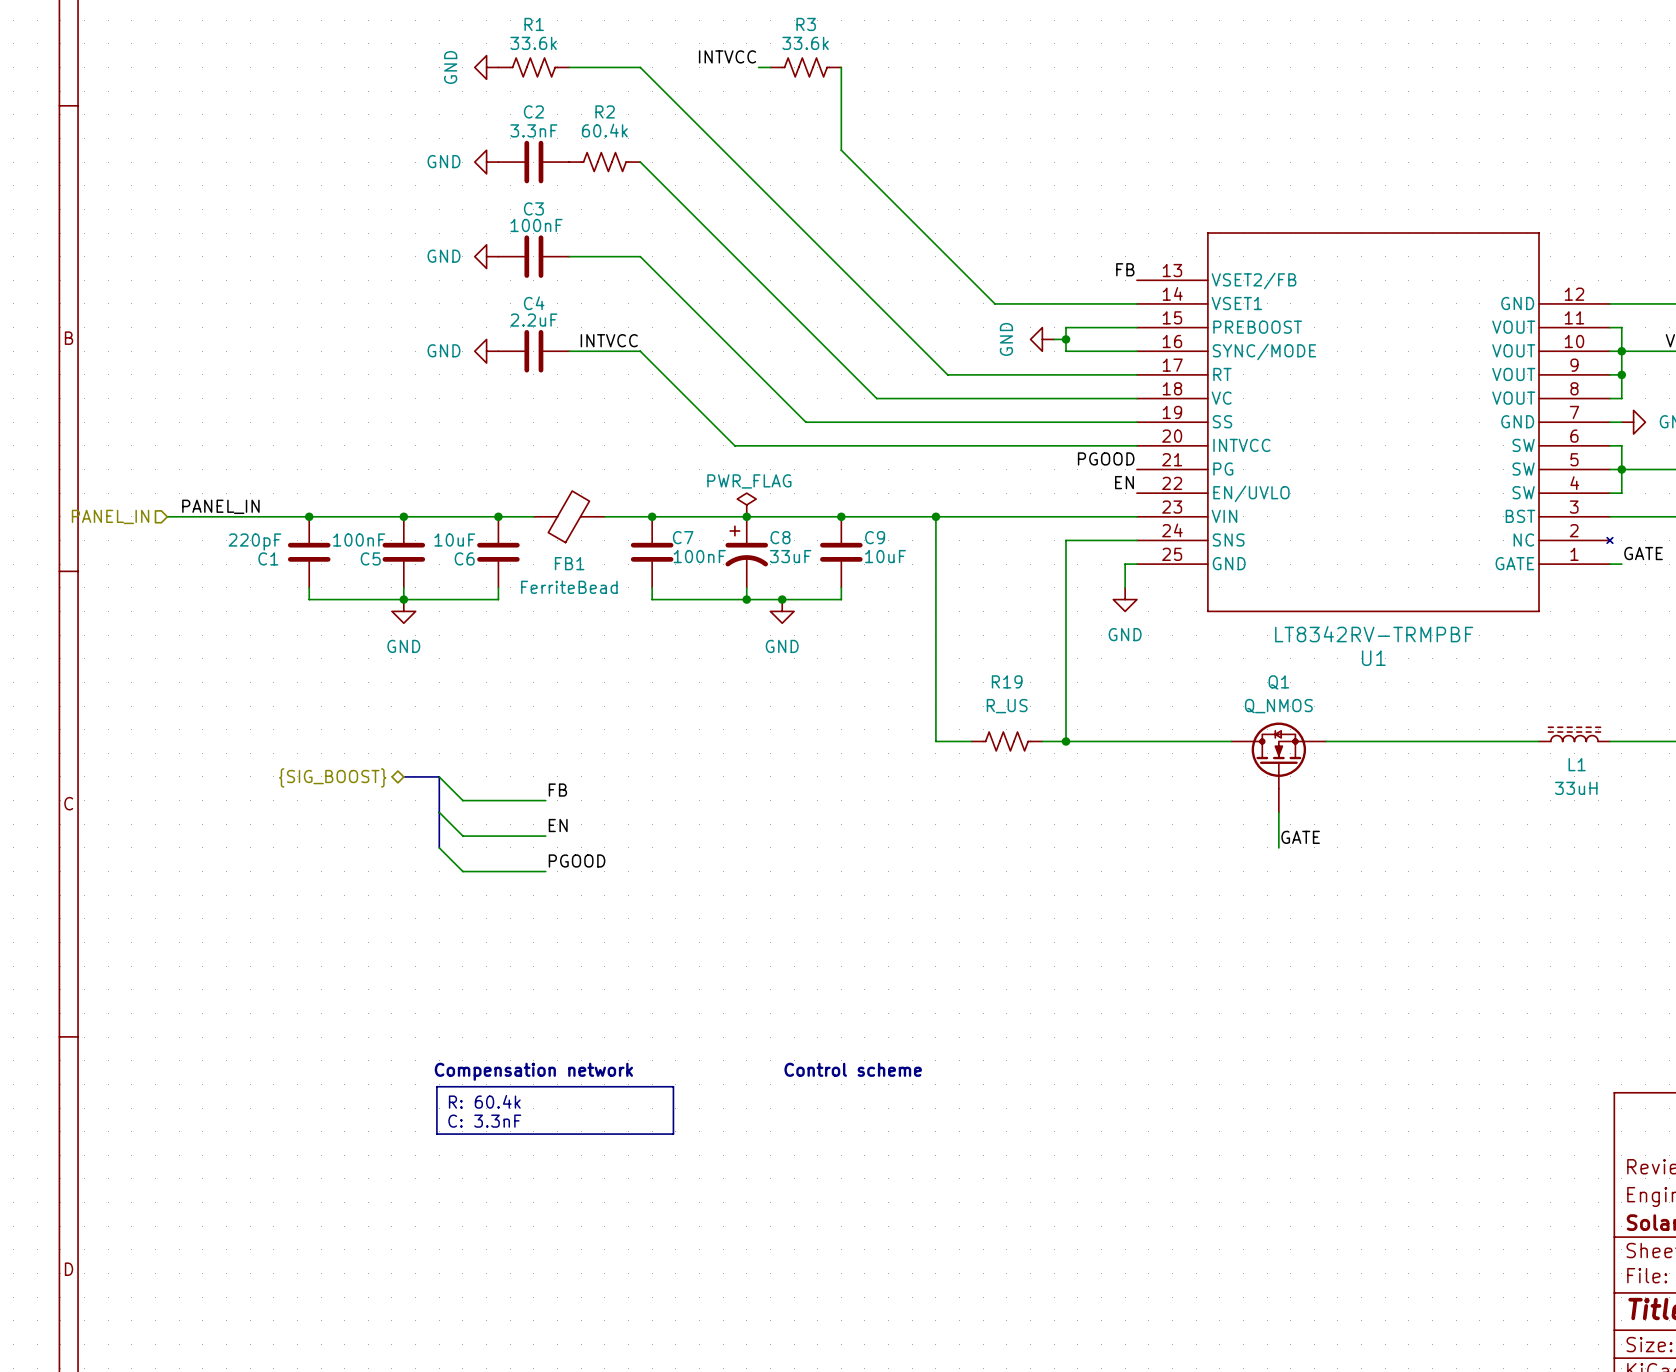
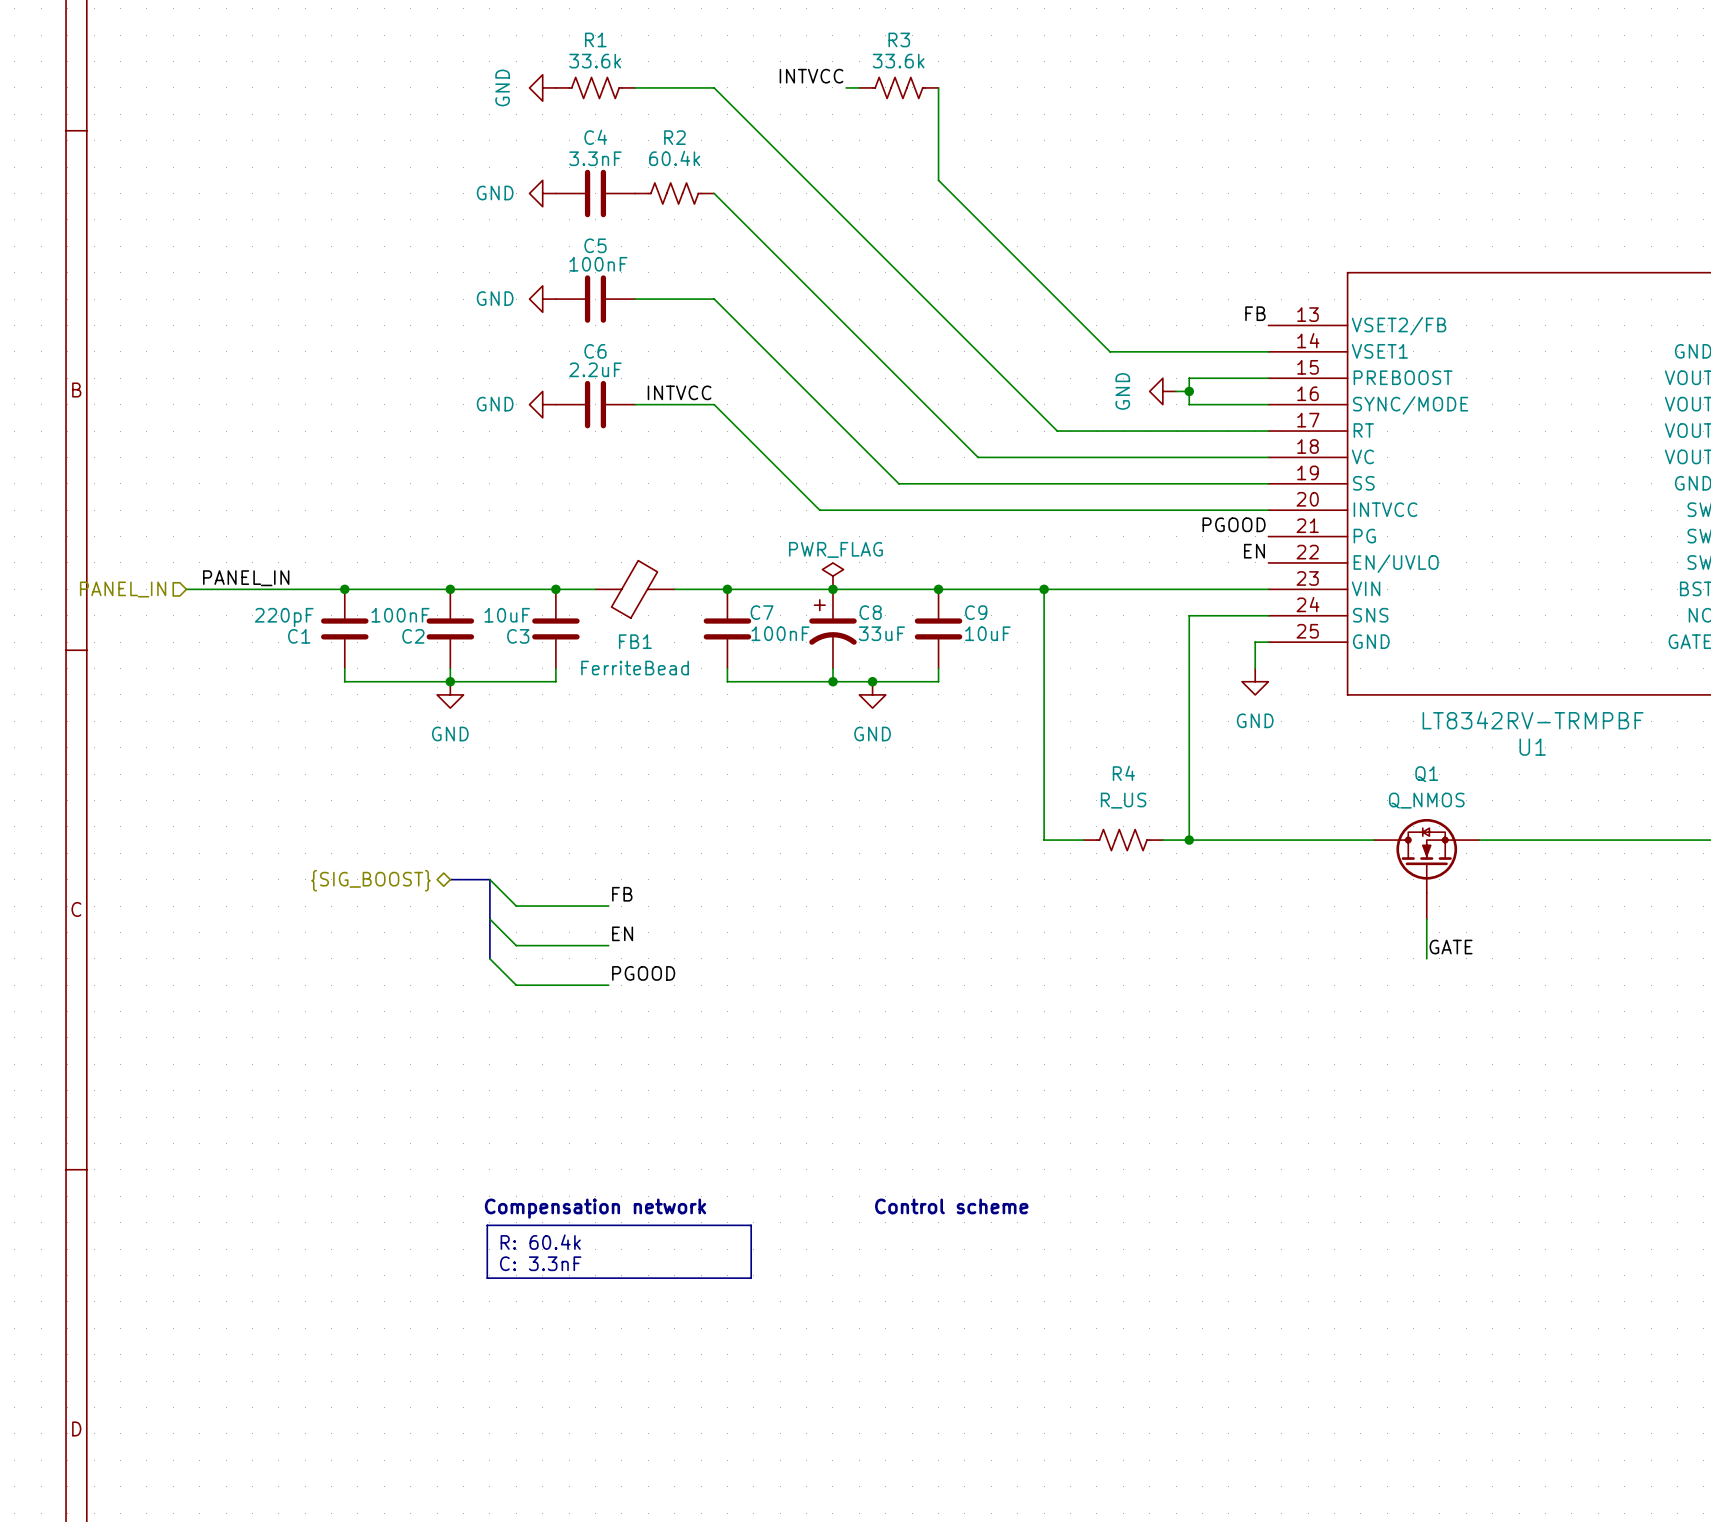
C2 name: C2 (533, 111) -> C4 (595, 137)
C3 name: C3 (533, 208) -> C5 (595, 245)
C4 name: C4 (534, 303) -> C6 (595, 351)
C5 name: C5 (370, 558) -> C2 (413, 636)
C6 name: C6 (464, 558) -> C3 (518, 636)
R19 name: R19 (1007, 681) -> R4 (1123, 773)

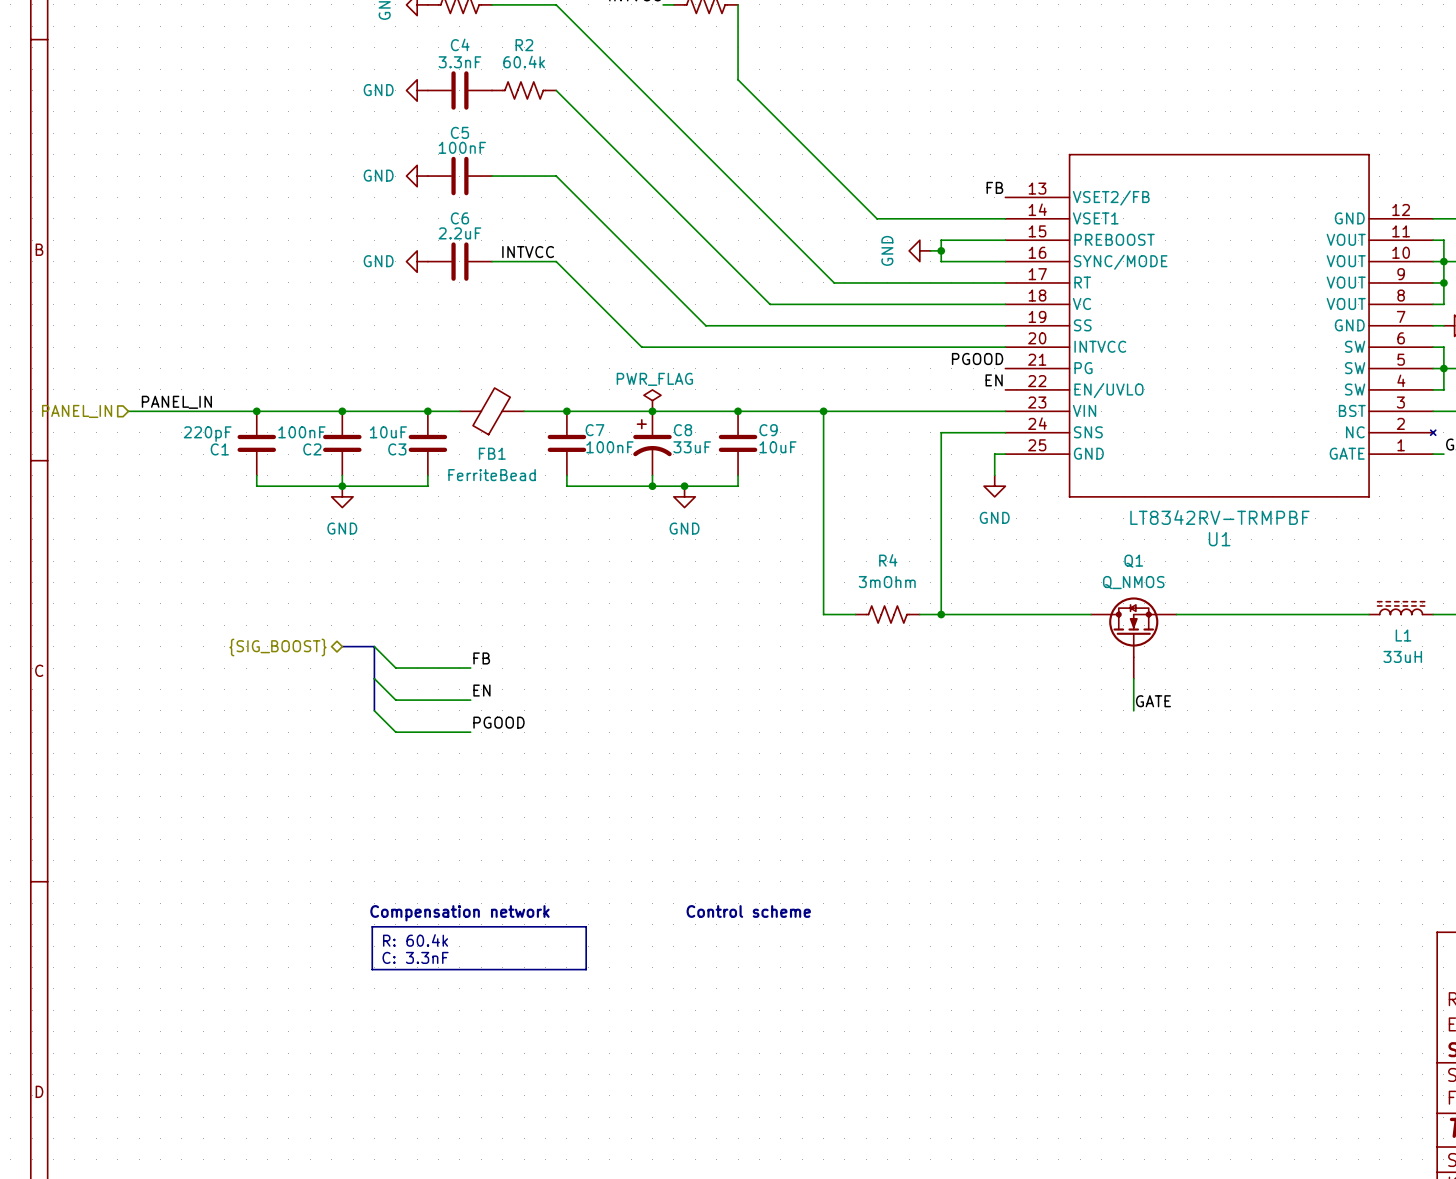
R4 value: R_US (1123, 800) -> 3mOhm (887, 582)

